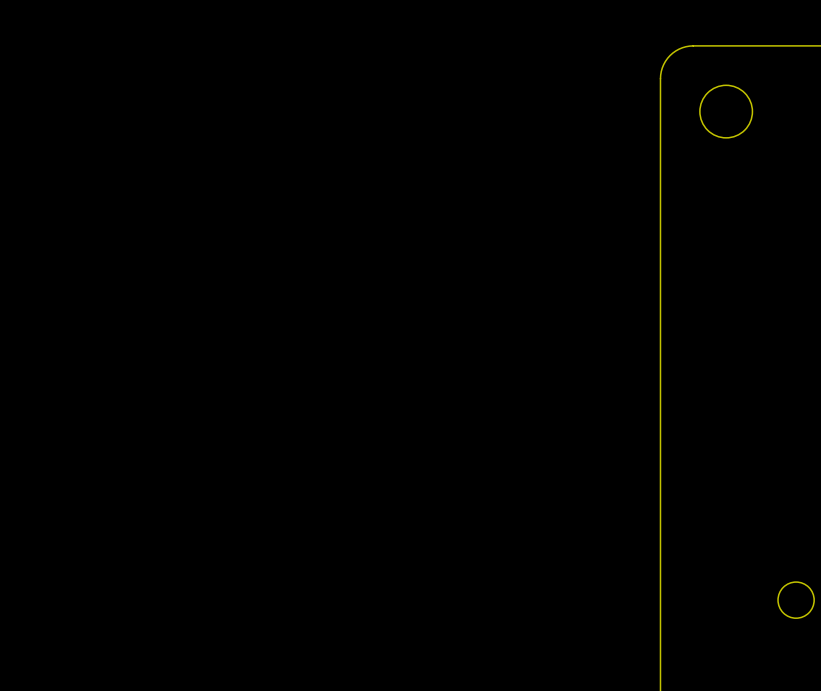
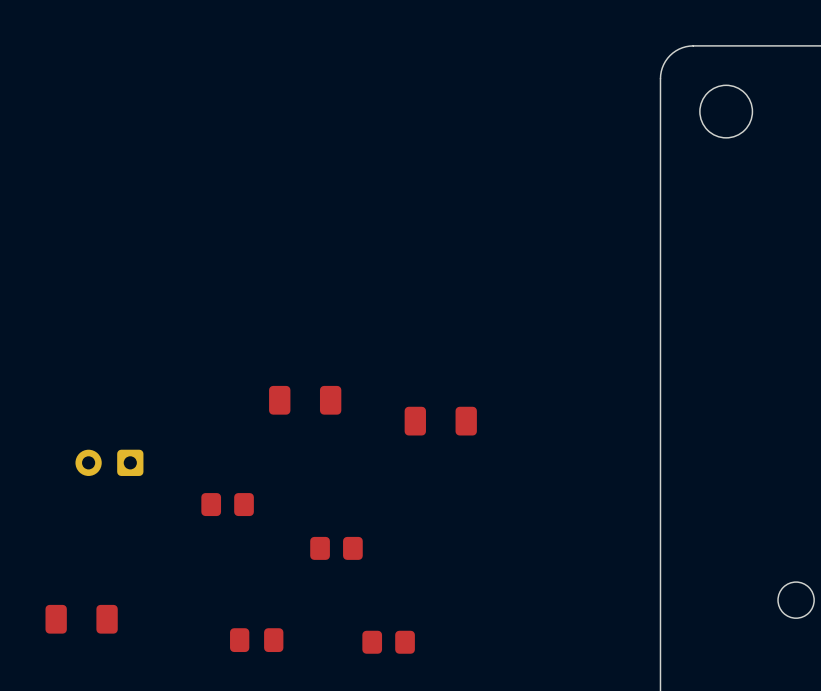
part: none -> (305, 400)
part: none -> (440, 421)
part: none -> (109, 462)
part: none -> (227, 504)
part: none -> (336, 548)
part: none -> (81, 619)
part: none -> (256, 640)
part: none -> (388, 642)

